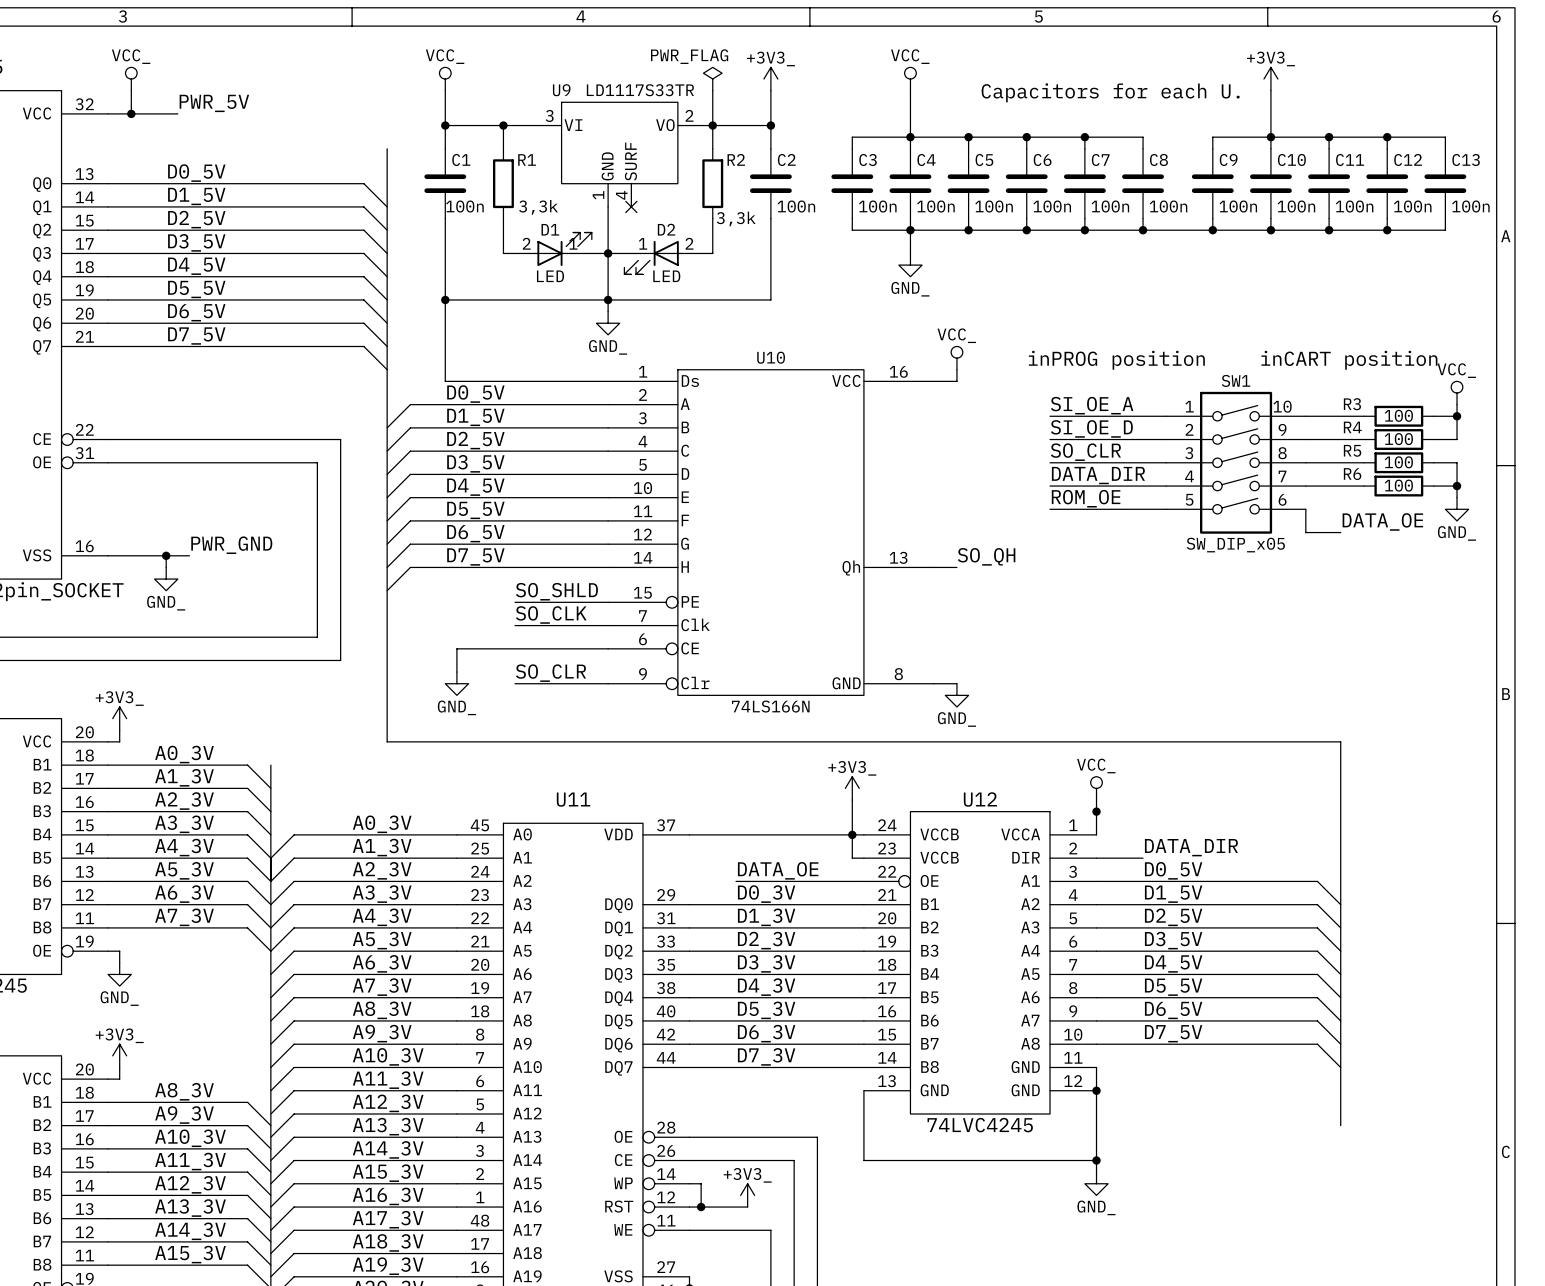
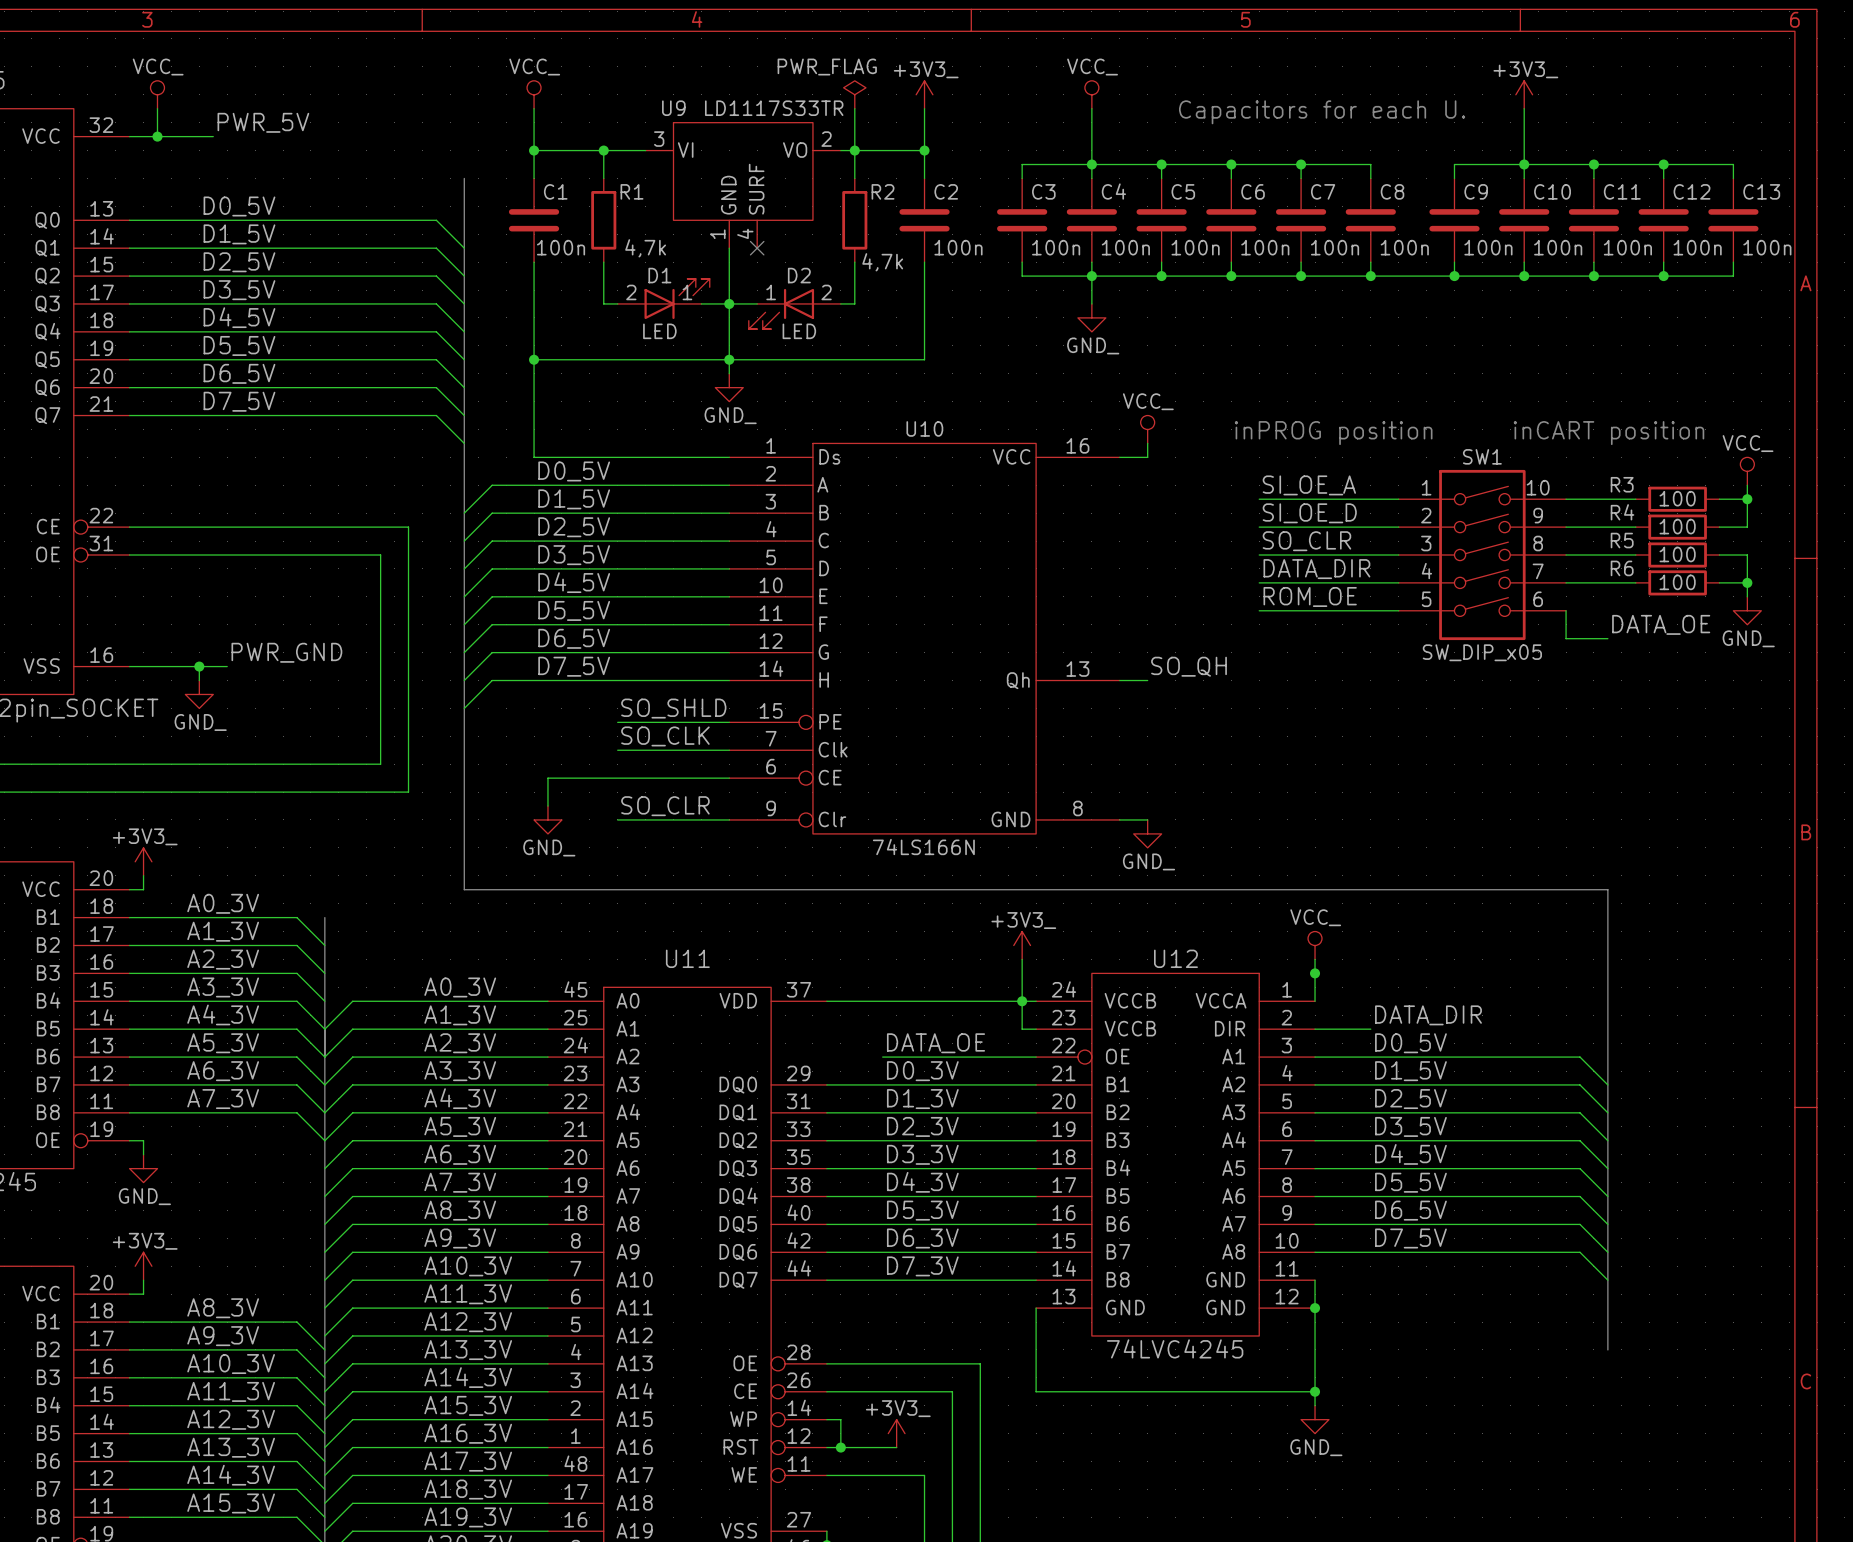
R1 value: 3,3k (538, 207) -> 4,7k (645, 248)
R2 value: 3,3k (736, 218) -> 4,7k (882, 262)

